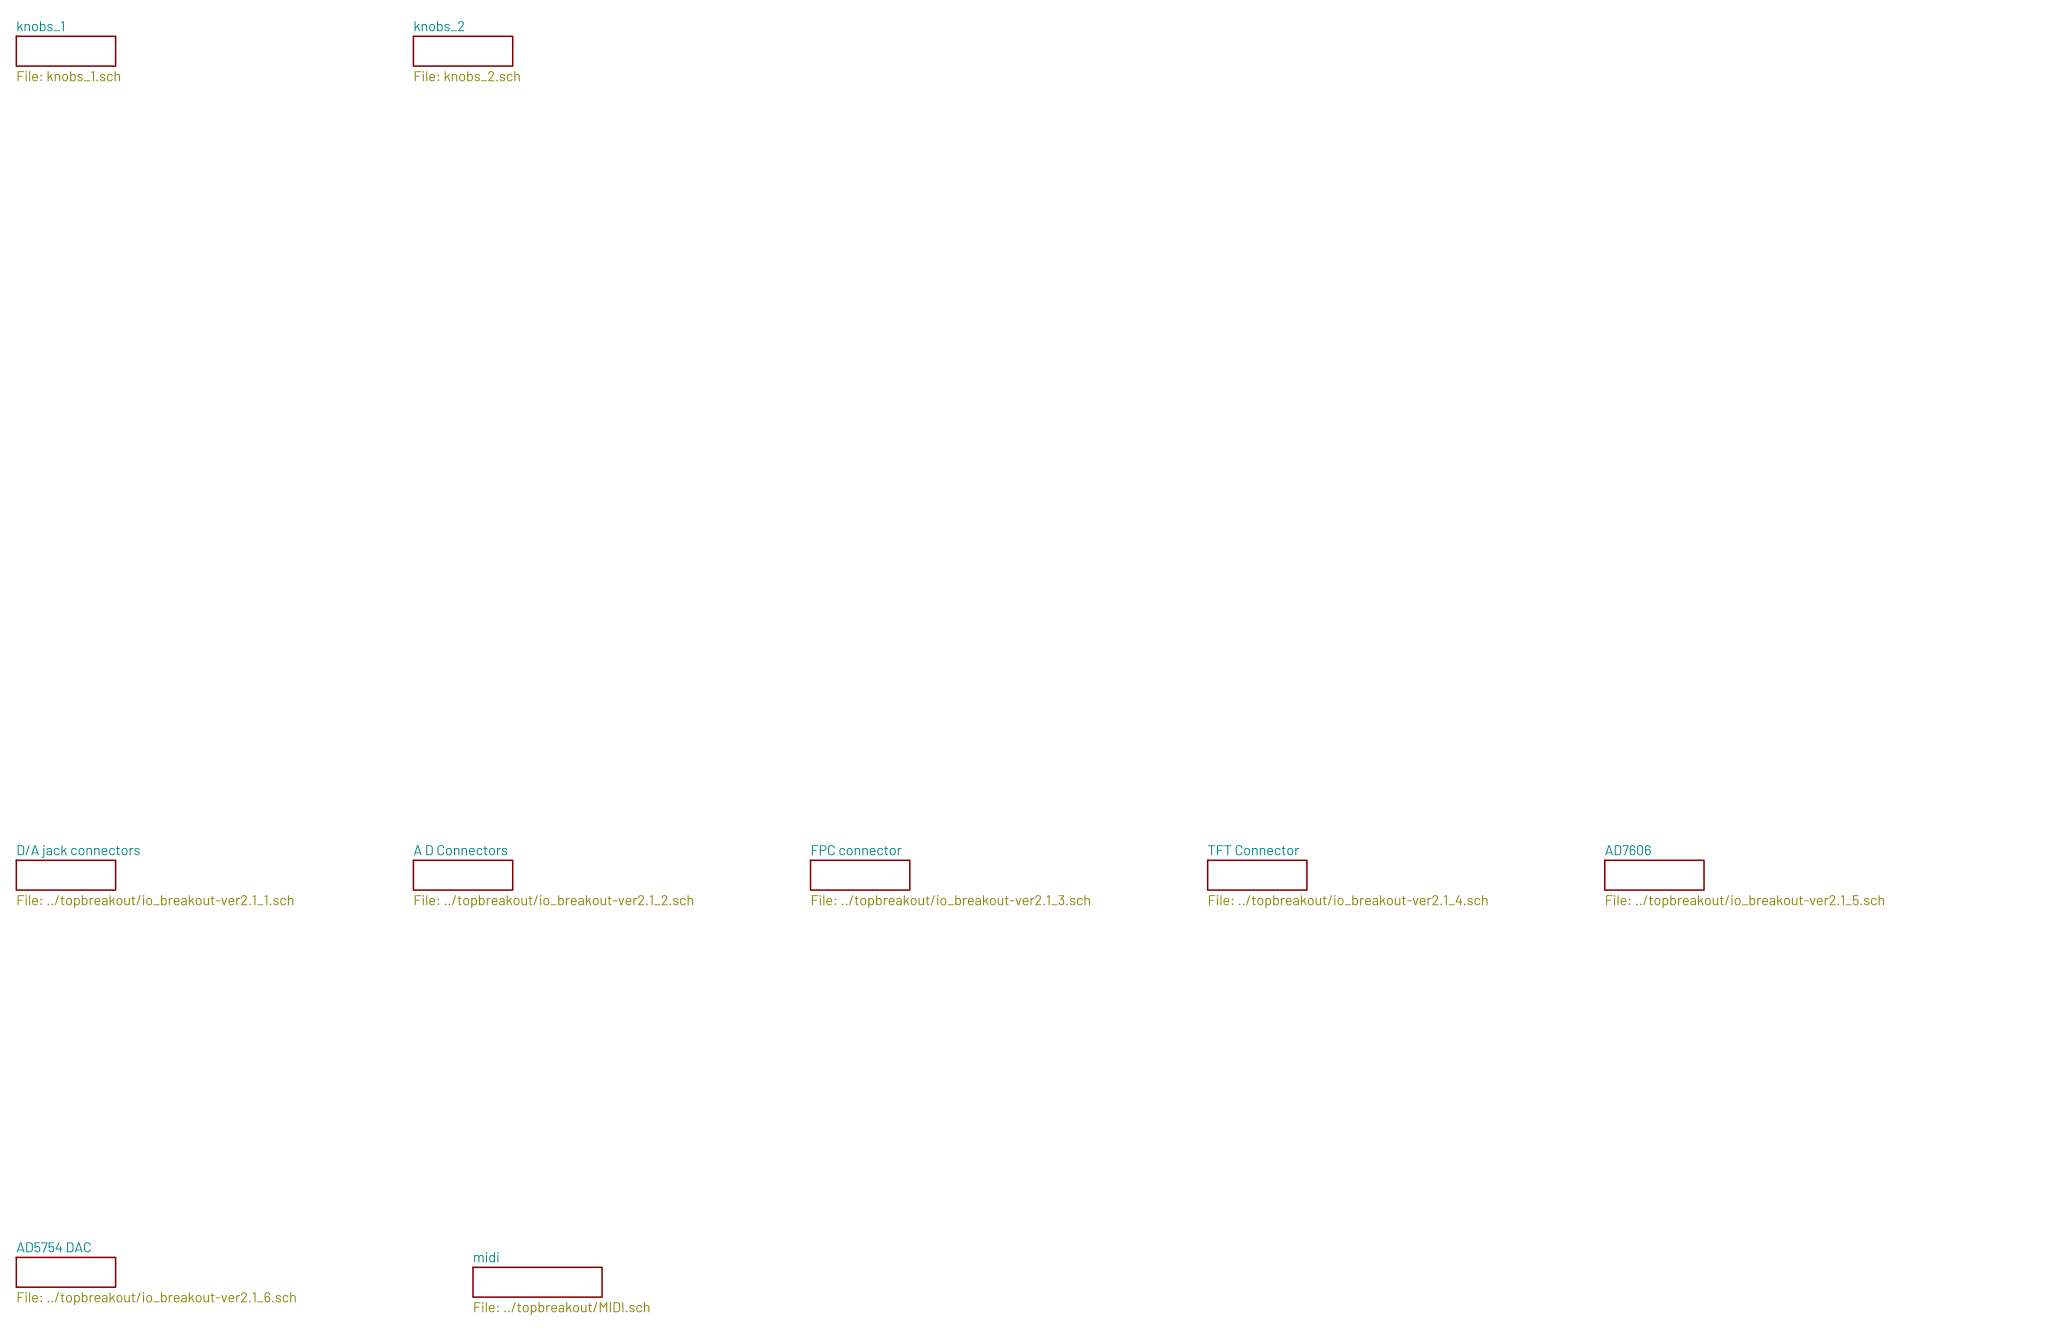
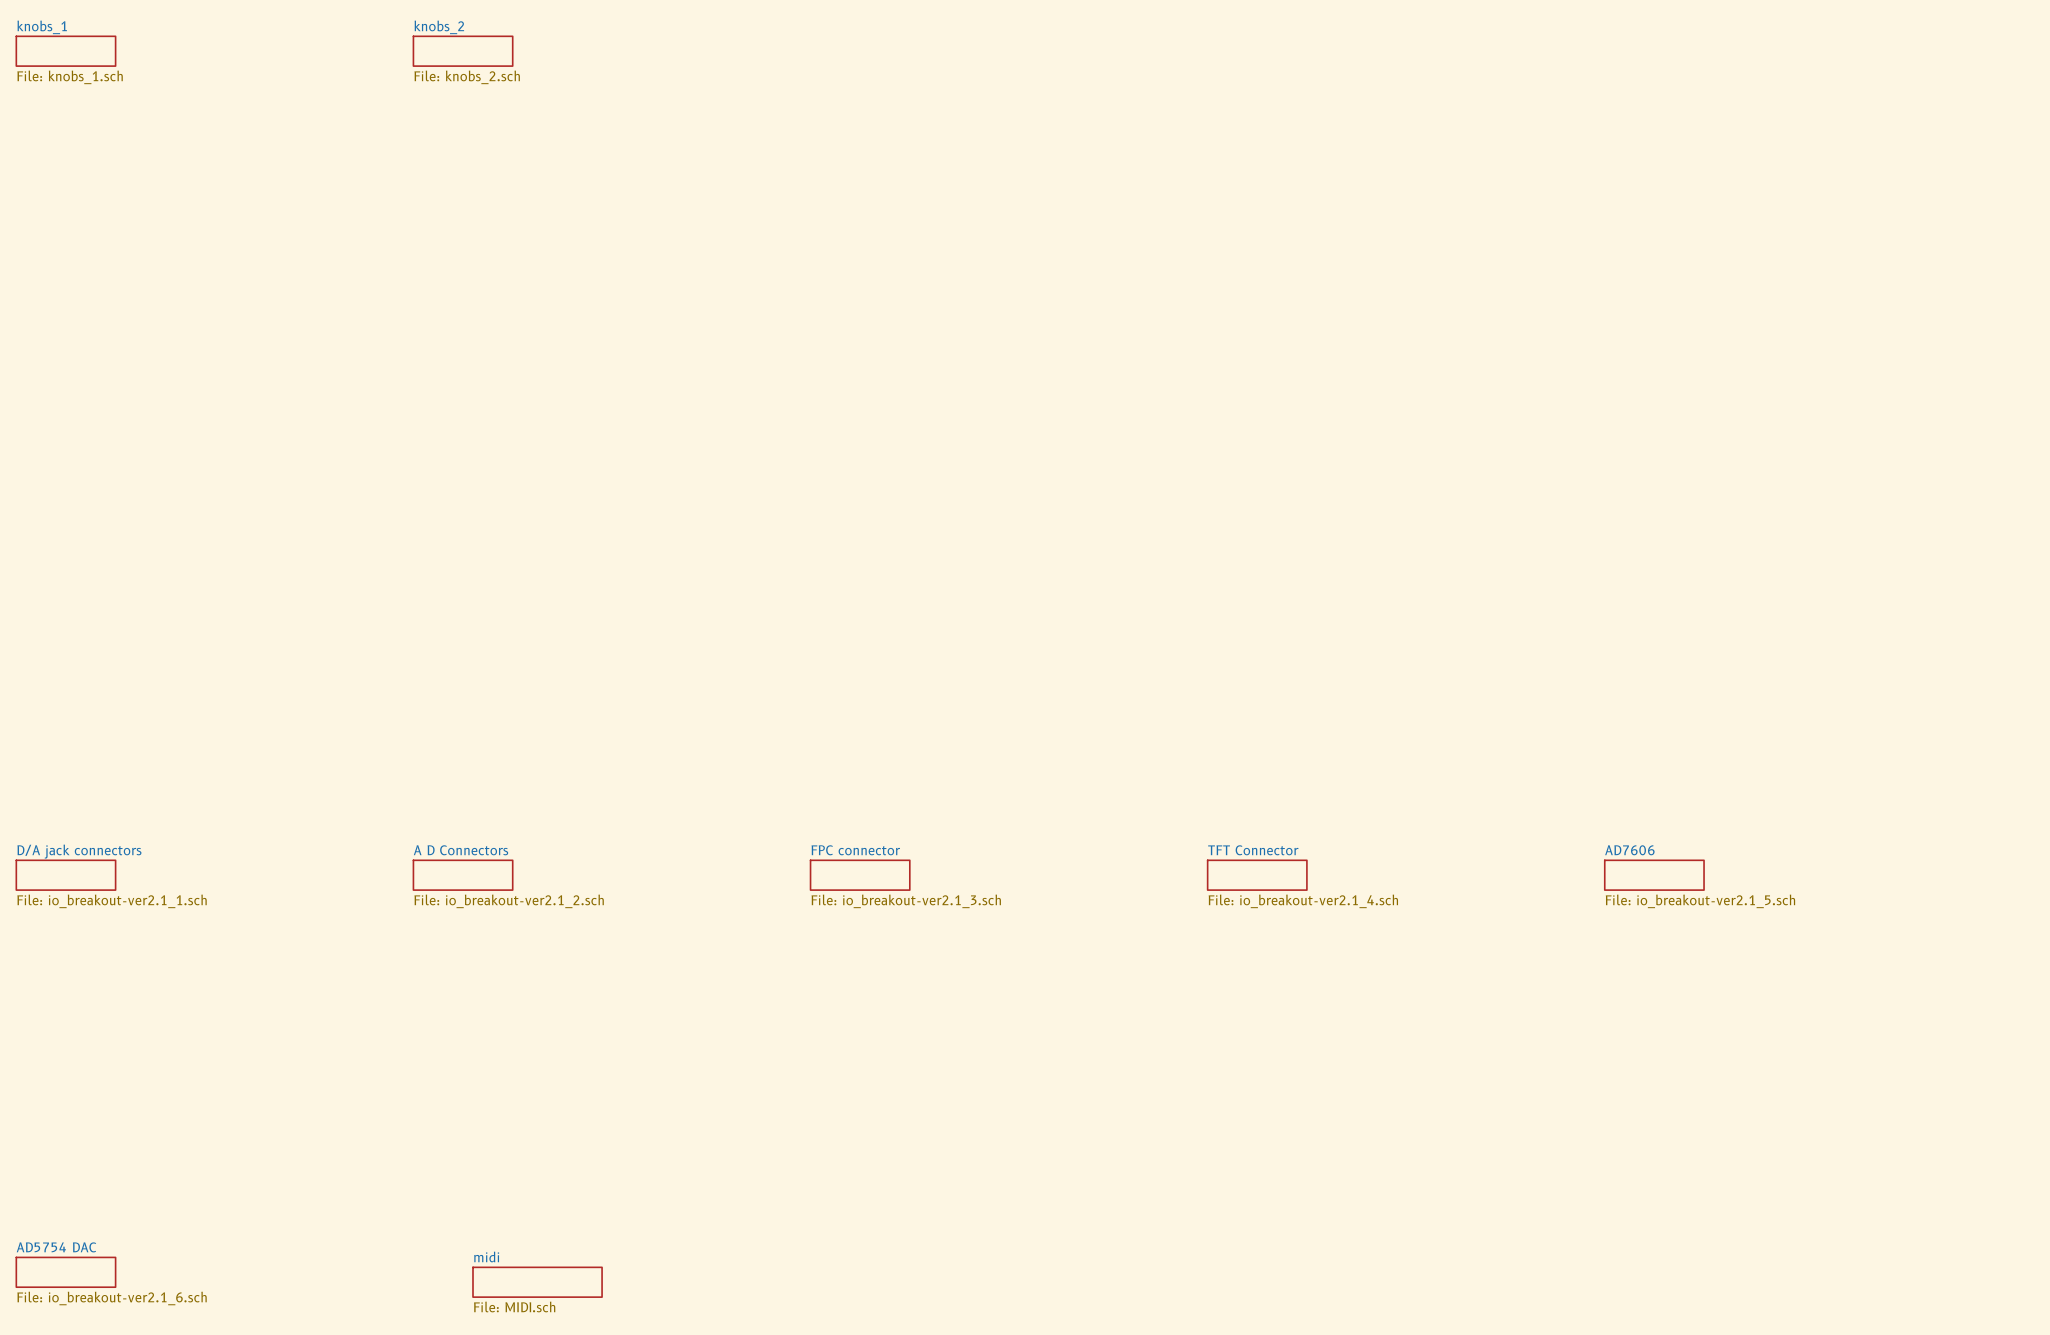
sheet D/A jack connectors value: File: ../topbreakout/io_breakout-ver2.1_1.sch (155, 901) -> File: io_breakout-ver2.1_1.sch (112, 901)
sheet A D Connectors value: File: ../topbreakout/io_breakout-ver2.1_2.sch (553, 901) -> File: io_breakout-ver2.1_2.sch (509, 901)
sheet FPC connector value: File: ../topbreakout/io_breakout-ver2.1_3.sch (950, 901) -> File: io_breakout-ver2.1_3.sch (906, 901)
sheet TFT Connector value: File: ../topbreakout/io_breakout-ver2.1_4.sch (1348, 901) -> File: io_breakout-ver2.1_4.sch (1303, 901)
sheet AD7606 value: File: ../topbreakout/io_breakout-ver2.1_5.sch (1745, 901) -> File: io_breakout-ver2.1_5.sch (1700, 901)
sheet AD5754 DAC value: File: ../topbreakout/io_breakout-ver2.1_6.sch (156, 1298) -> File: io_breakout-ver2.1_6.sch (112, 1298)
sheet midi value: File: ../topbreakout/MIDI.sch (561, 1308) -> File: MIDI.sch (514, 1306)

